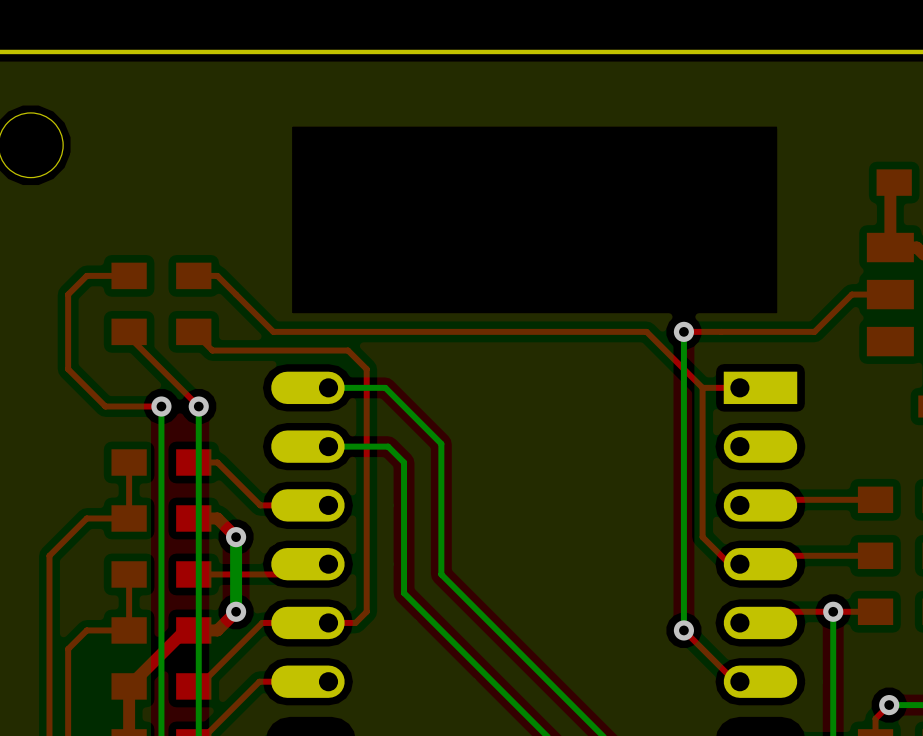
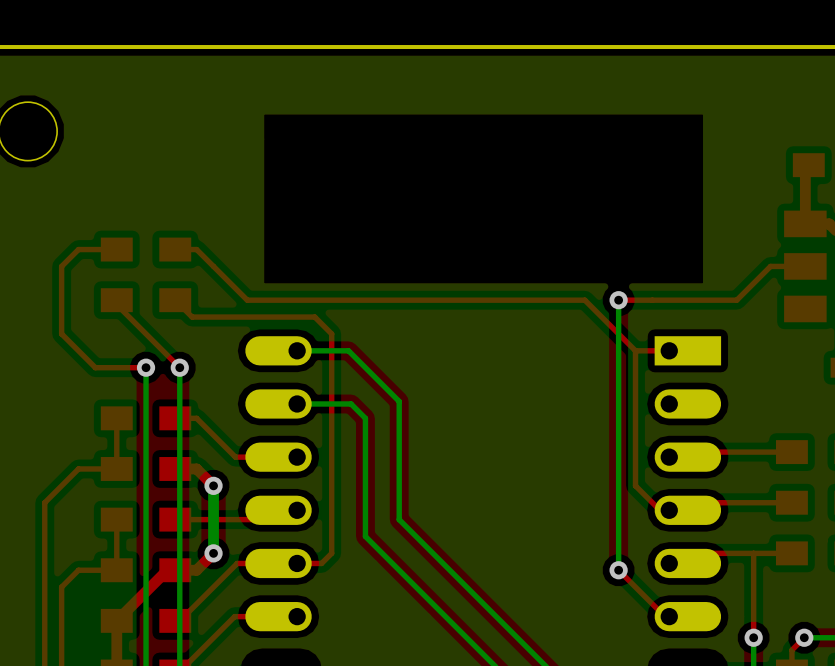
top track: none -> (753, 553) (753, 637)
bottom track: (833, 611) (833, 705) -> none
via position: (833, 611) -> (753, 637)

